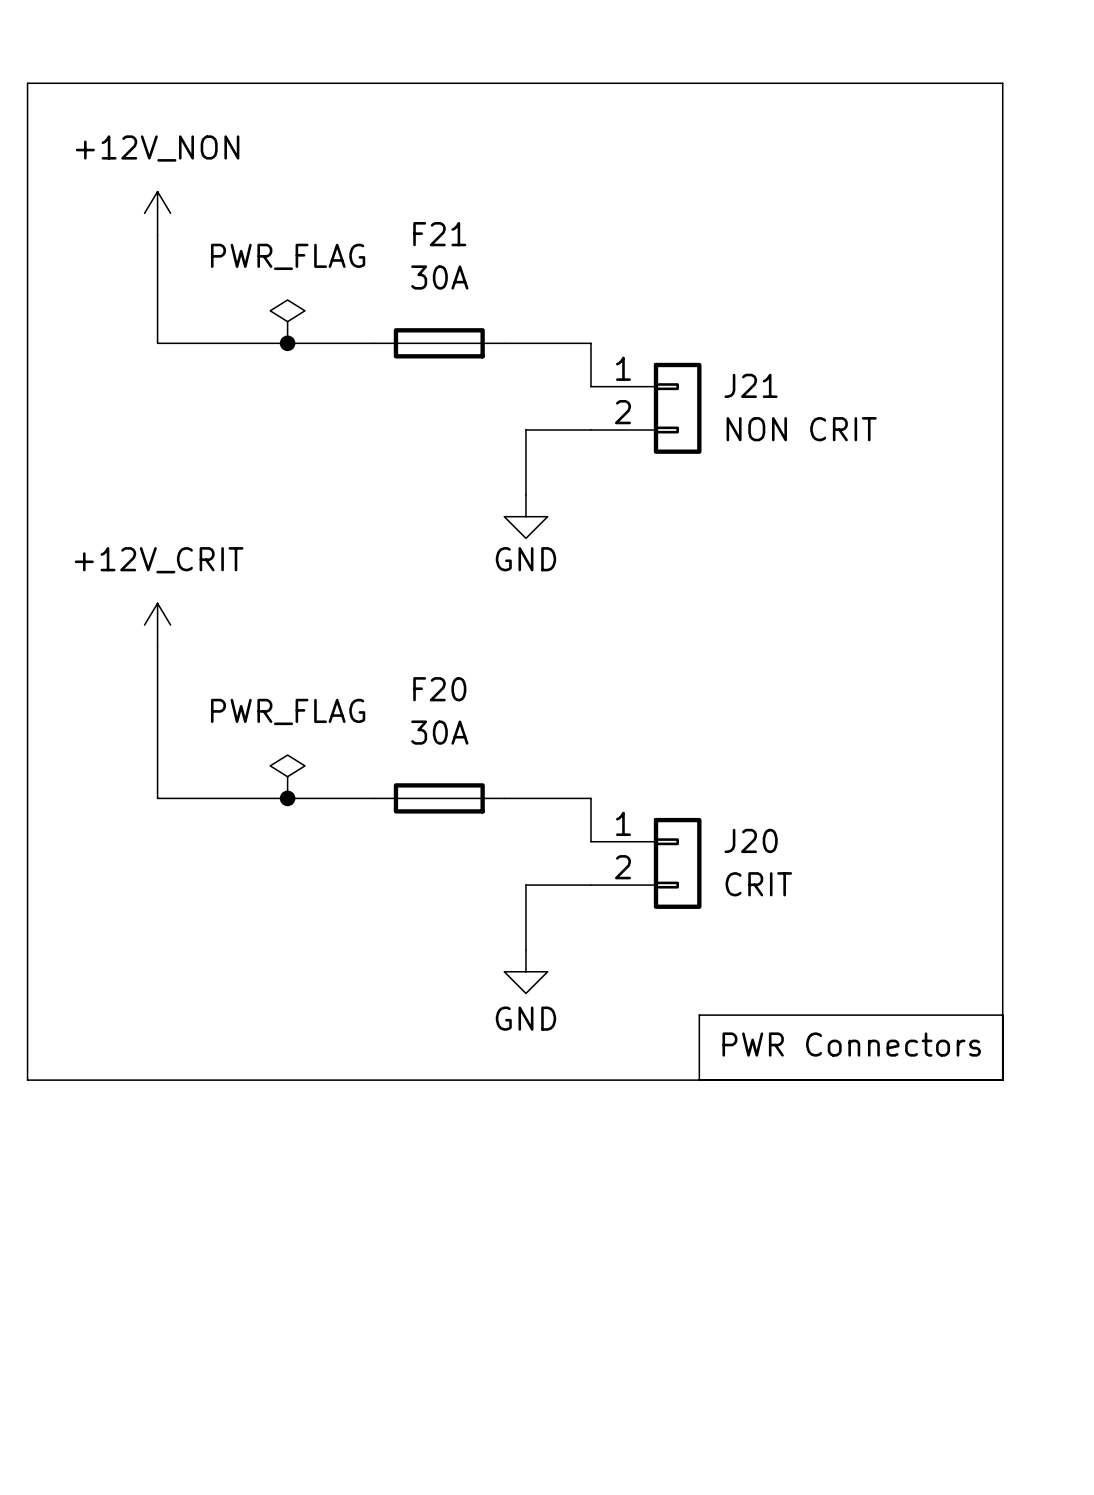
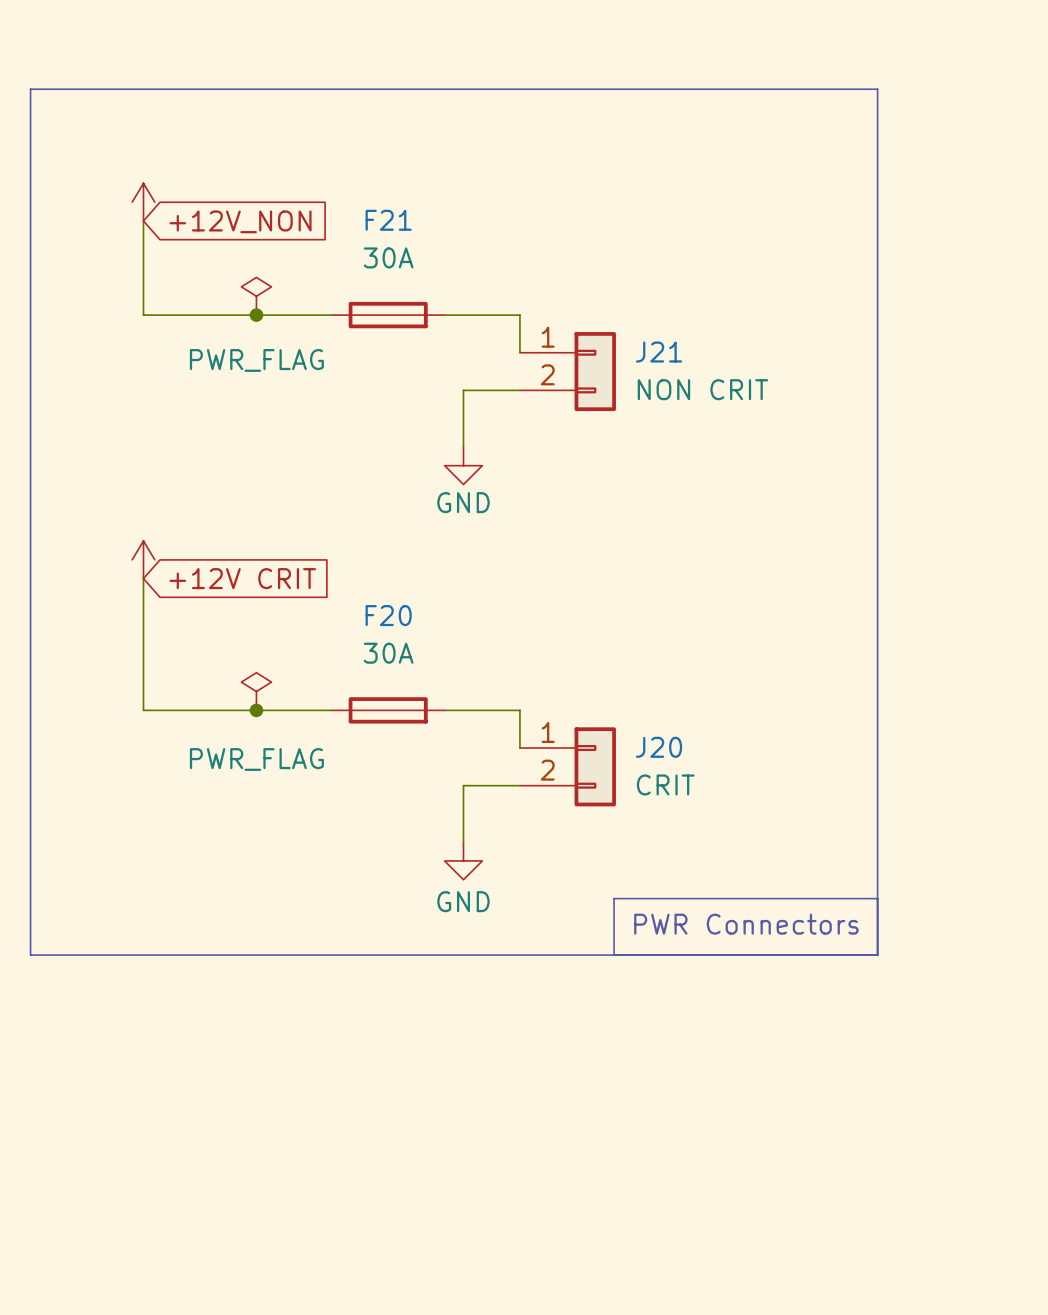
power symbol text: +12V_NON (157, 148) -> none
global label: none -> +12V_NON (240, 221)
power symbol text position: PWR_FLAG (288, 256) -> PWR_FLAG (256, 360)
power symbol text: +12V_CRIT (159, 560) -> none
global label: none -> +12V CRIT (242, 578)
power symbol text position: PWR_FLAG (288, 711) -> PWR_FLAG (256, 759)

